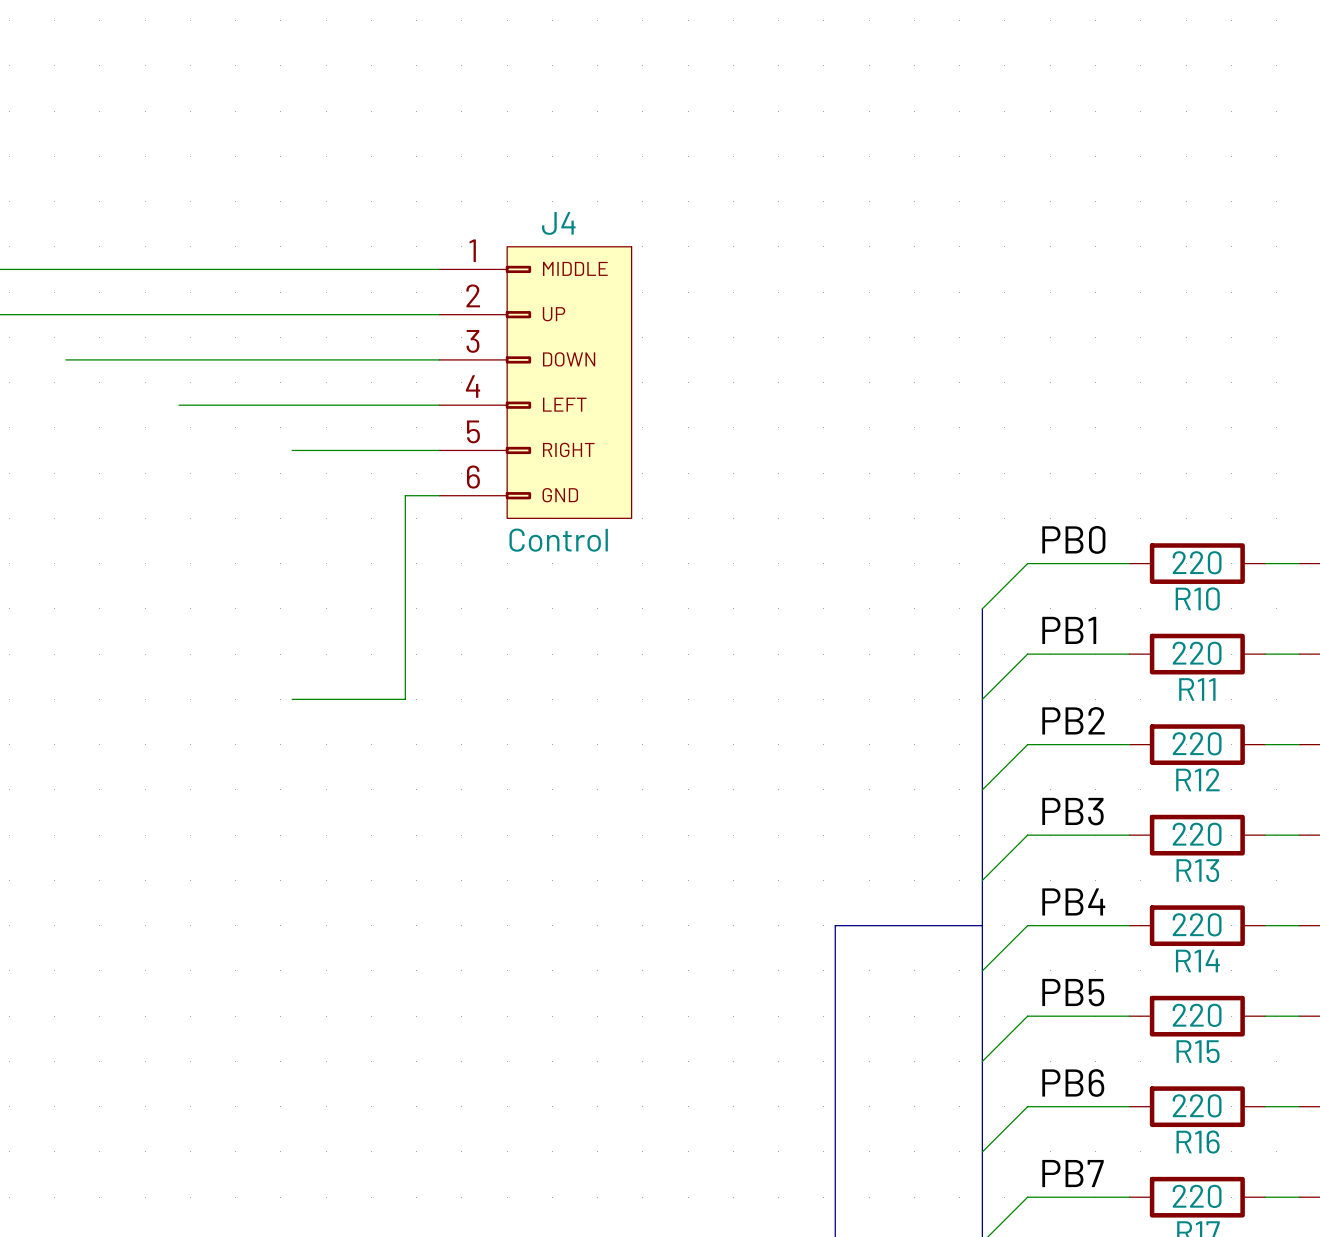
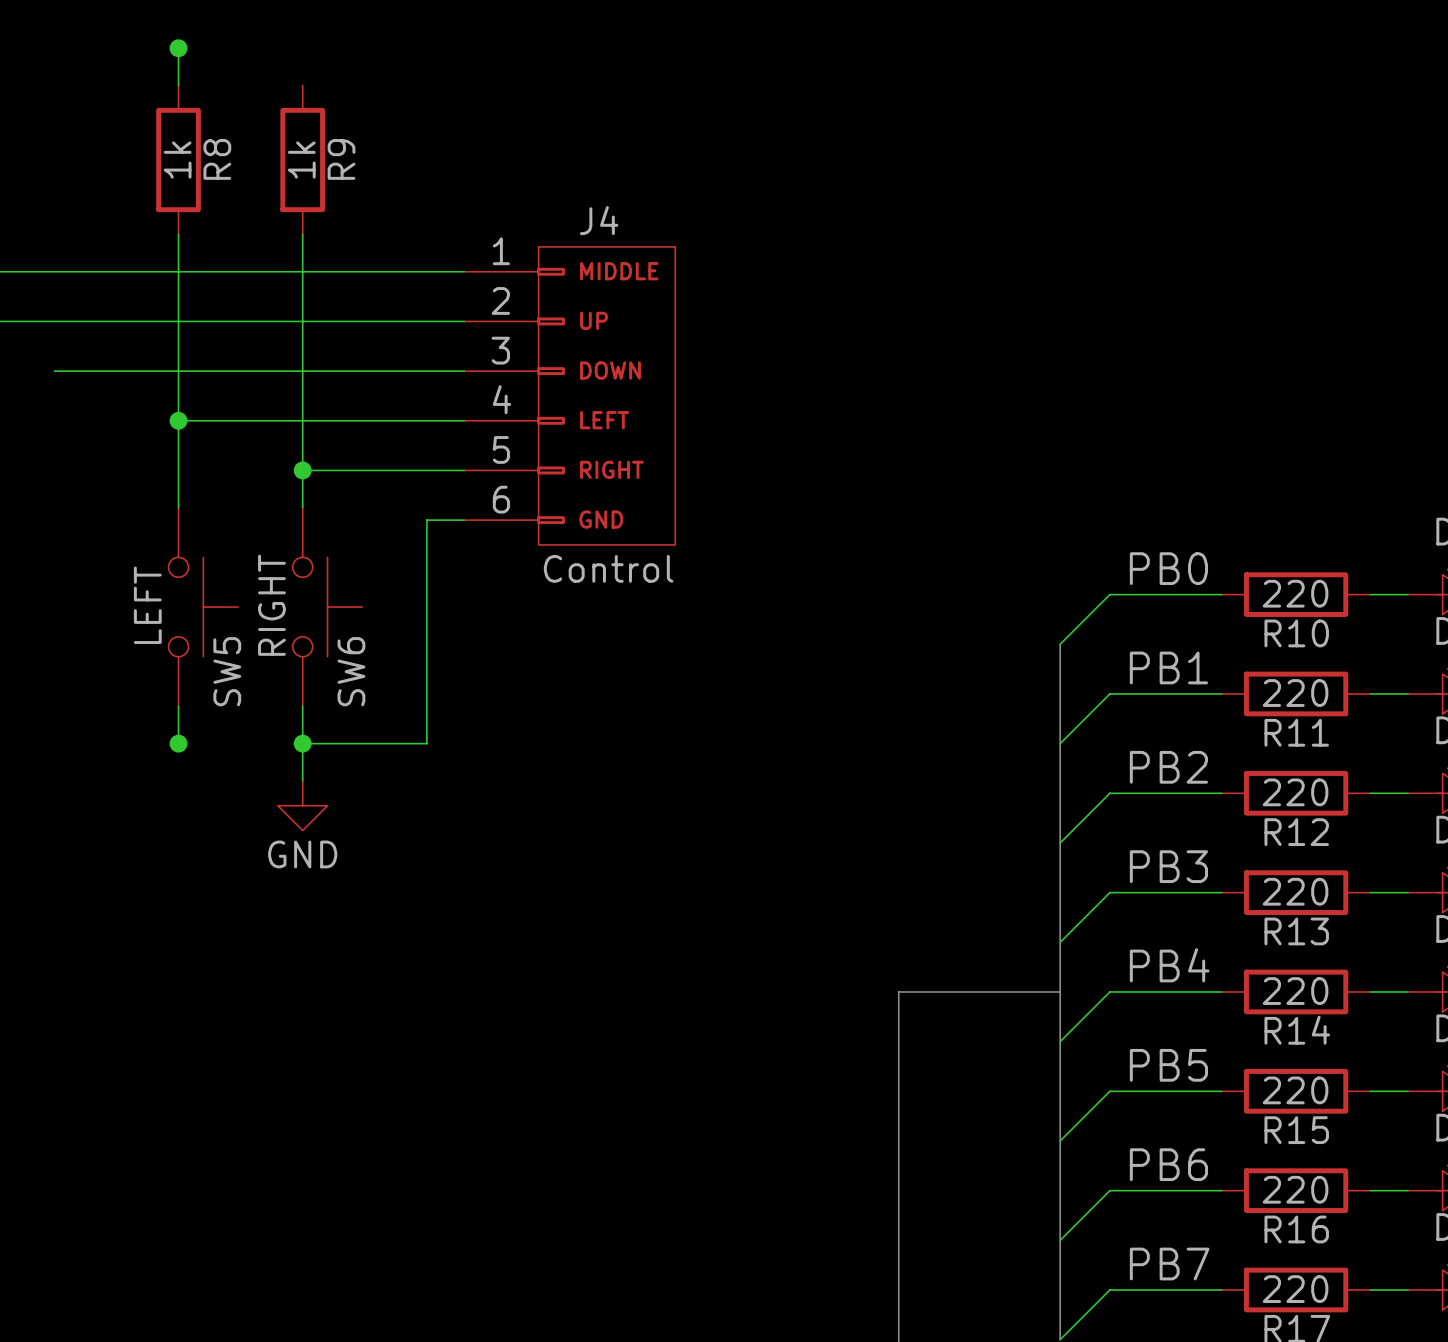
wire: none -> (178, 48) (178, 85)
junction: none -> (178, 48)
R8: none -> 1k (178, 160)
R9: none -> 1k (302, 160)
wire: none -> (178, 234) (178, 507)
wire: none -> (302, 234) (302, 507)
junction: none -> (178, 420)
junction: none -> (302, 470)
SW5: none -> LEFT (203, 607)
SW6: none -> RIGHT (327, 607)
wire: none -> (178, 706) (178, 743)
wire: none -> (302, 706) (302, 780)
junction: none -> (178, 743)
junction: none -> (302, 743)
power symbol: none -> GND (302, 805)

